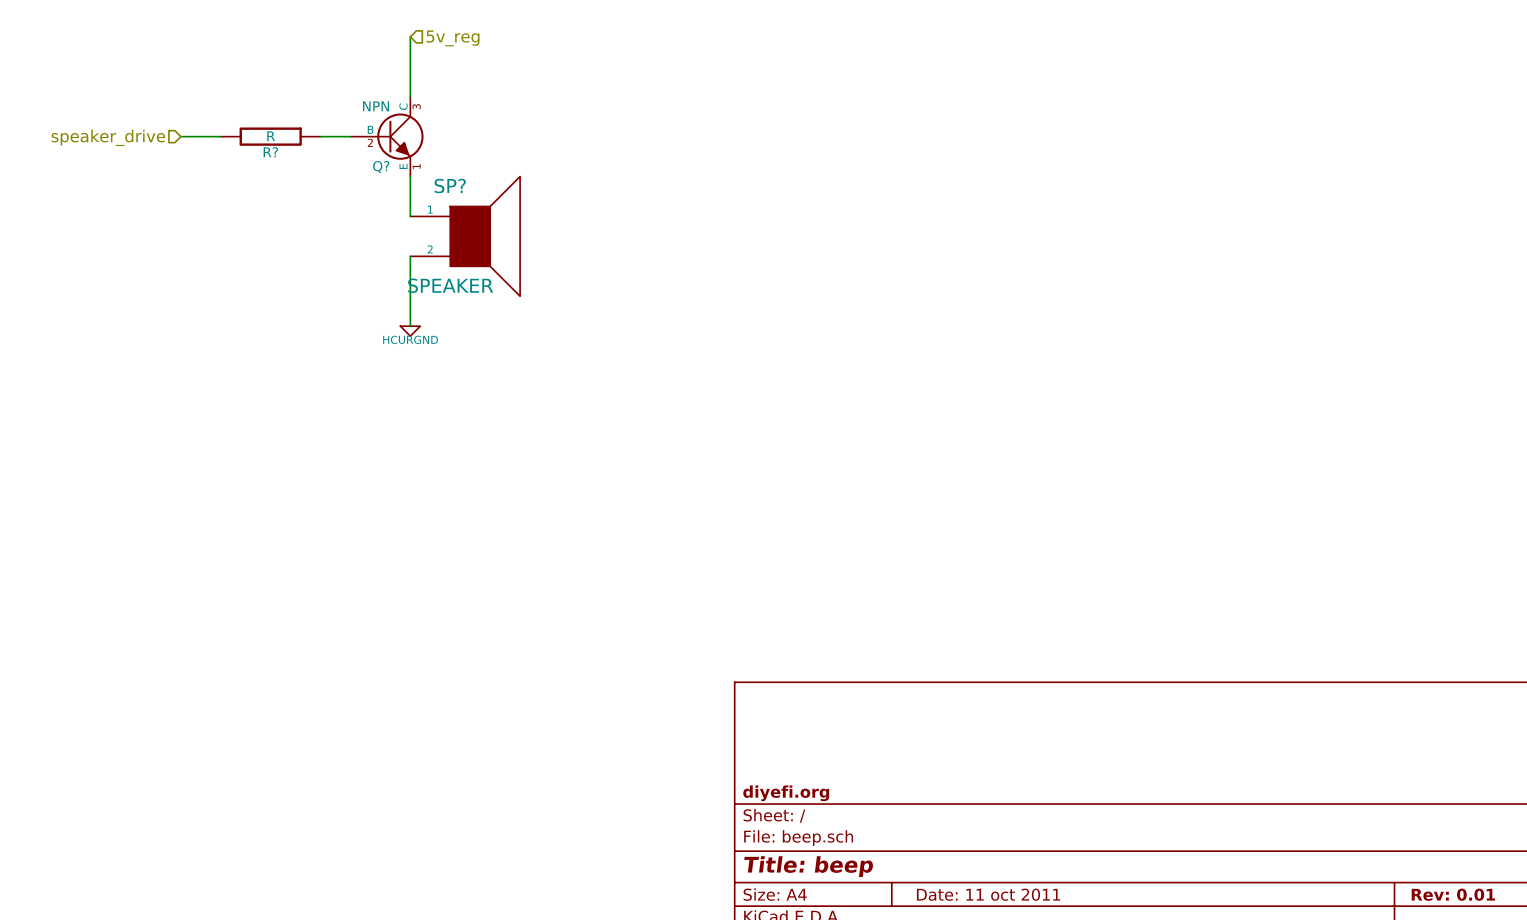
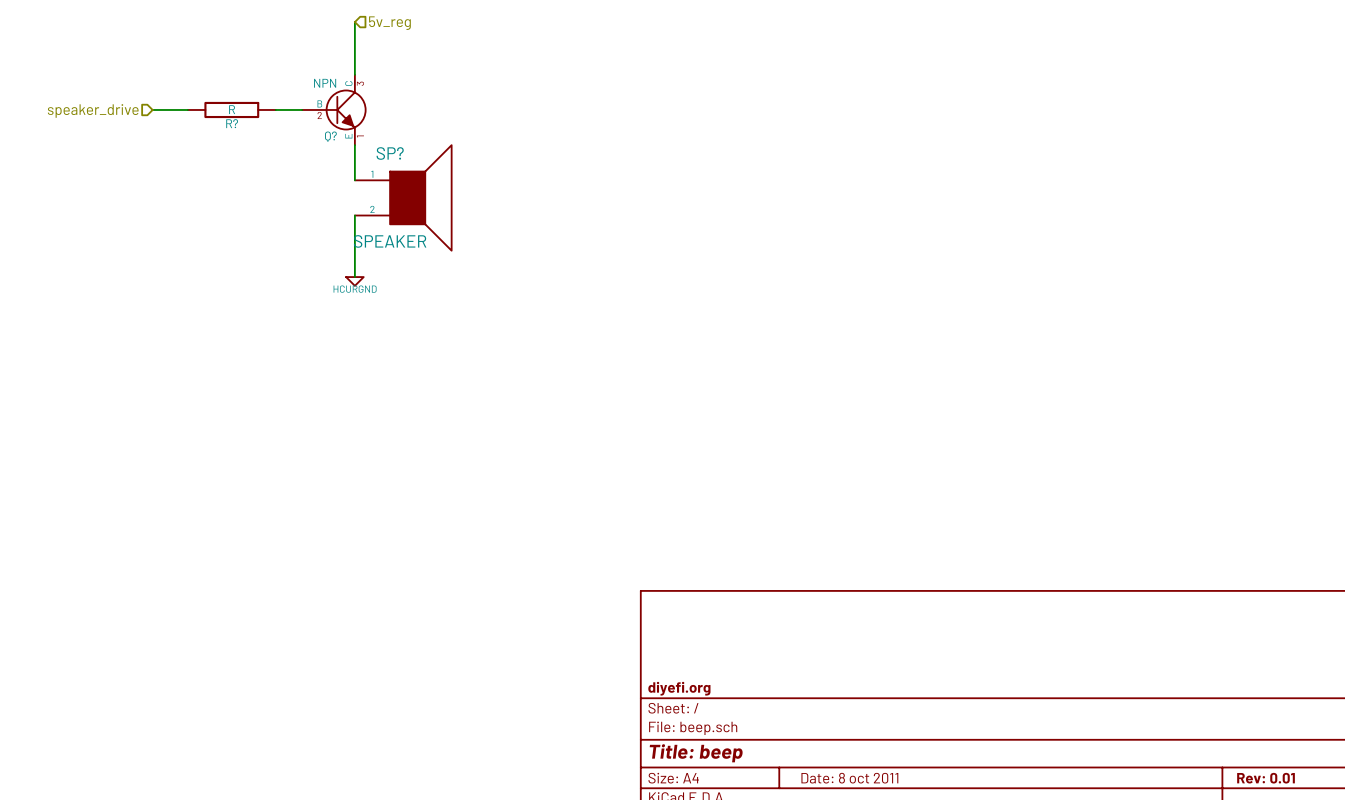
title block: Date: 11 oct 2011 (988, 894) -> Date: 8 oct 2011 (849, 778)

